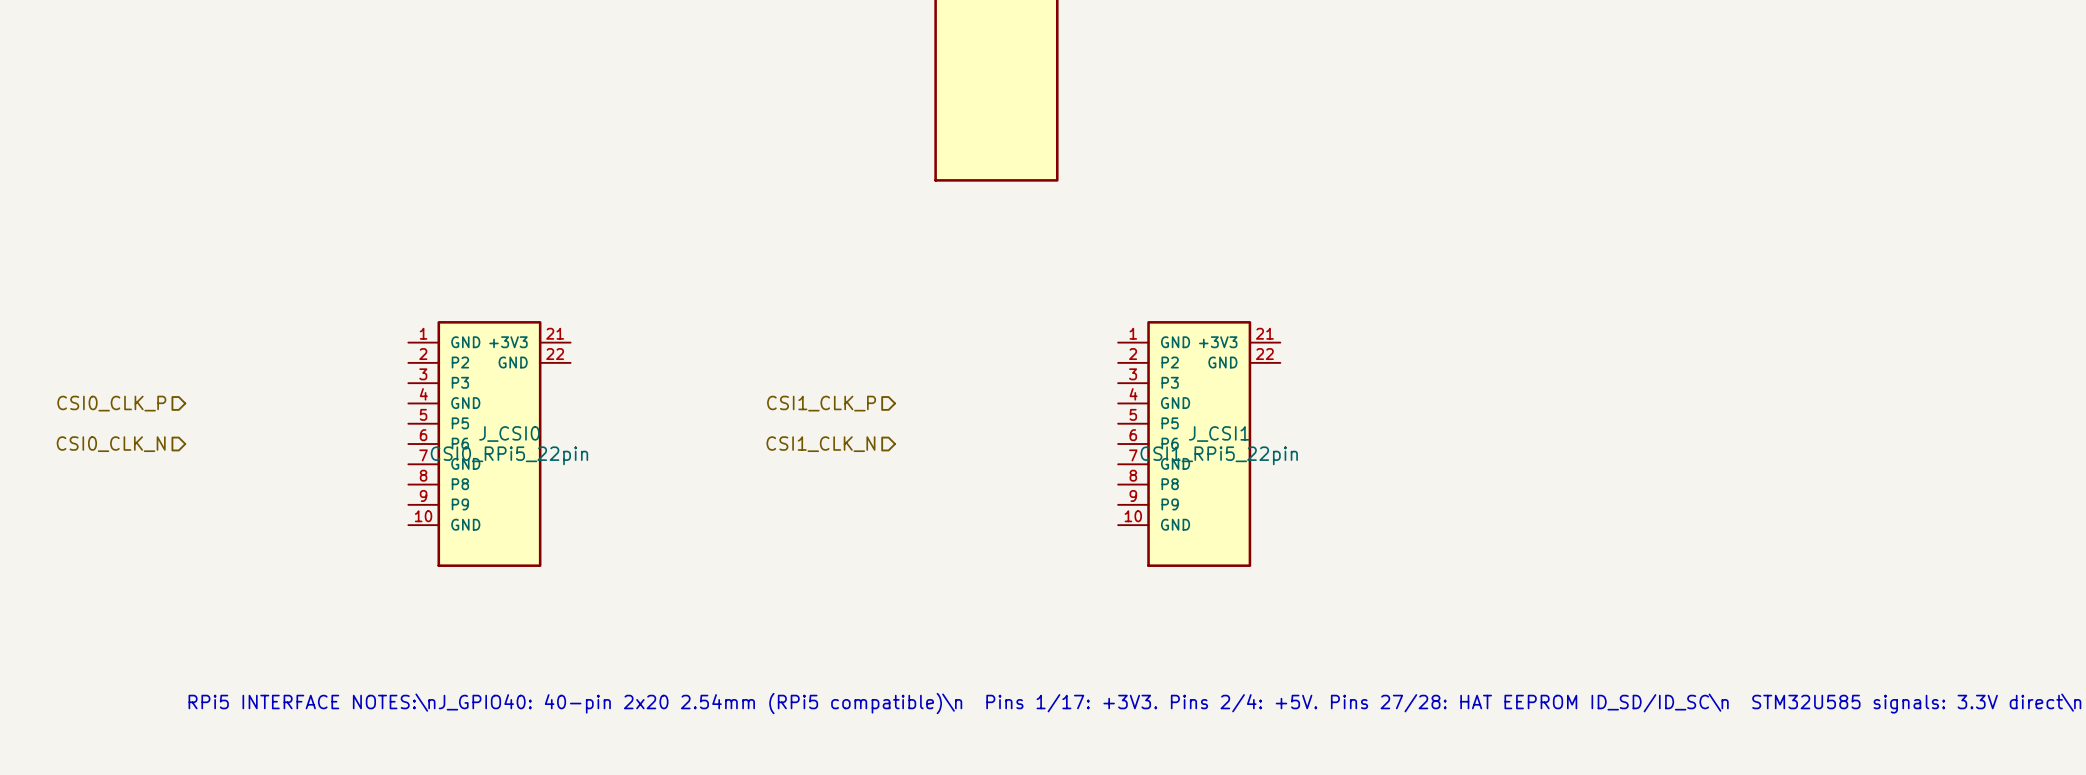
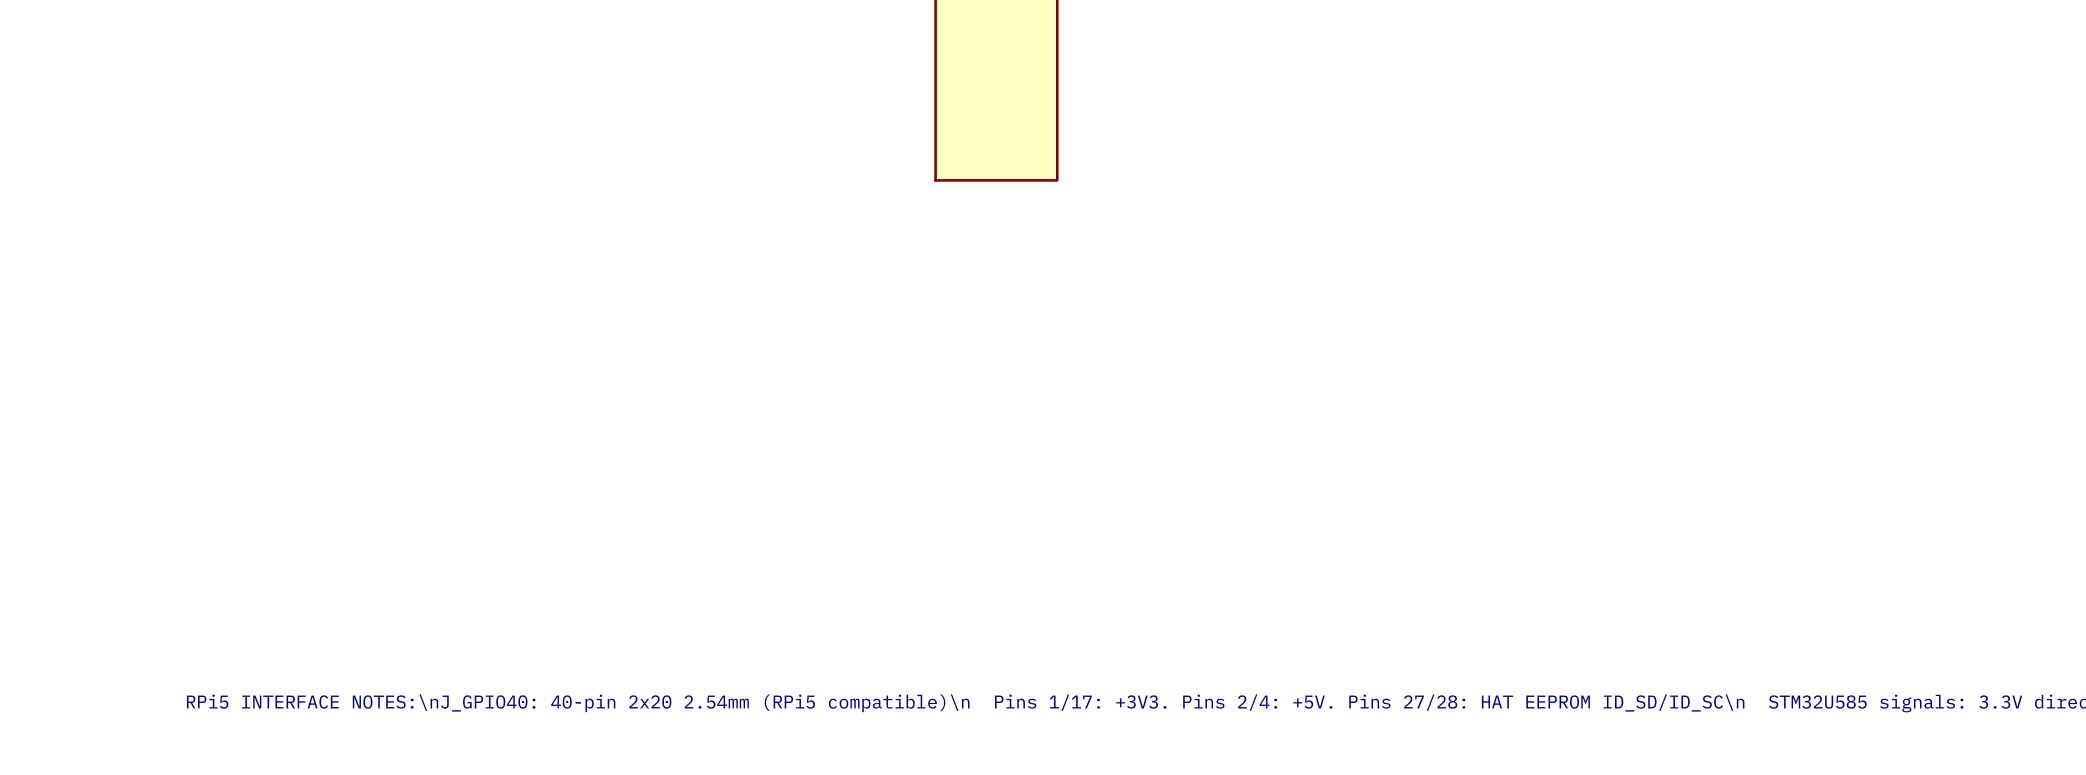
hierarchical label: CSI0_CLK_P (111, 403) -> none
hierarchical label: CSI1_CLK_P (821, 403) -> none
hierarchical label: CSI0_CLK_N (111, 444) -> none
J_CSI0: CSI0_RPi5_22pin (489, 444) -> none
hierarchical label: CSI1_CLK_N (820, 444) -> none
J_CSI1: CSI1_RPi5_22pin (1199, 444) -> none

